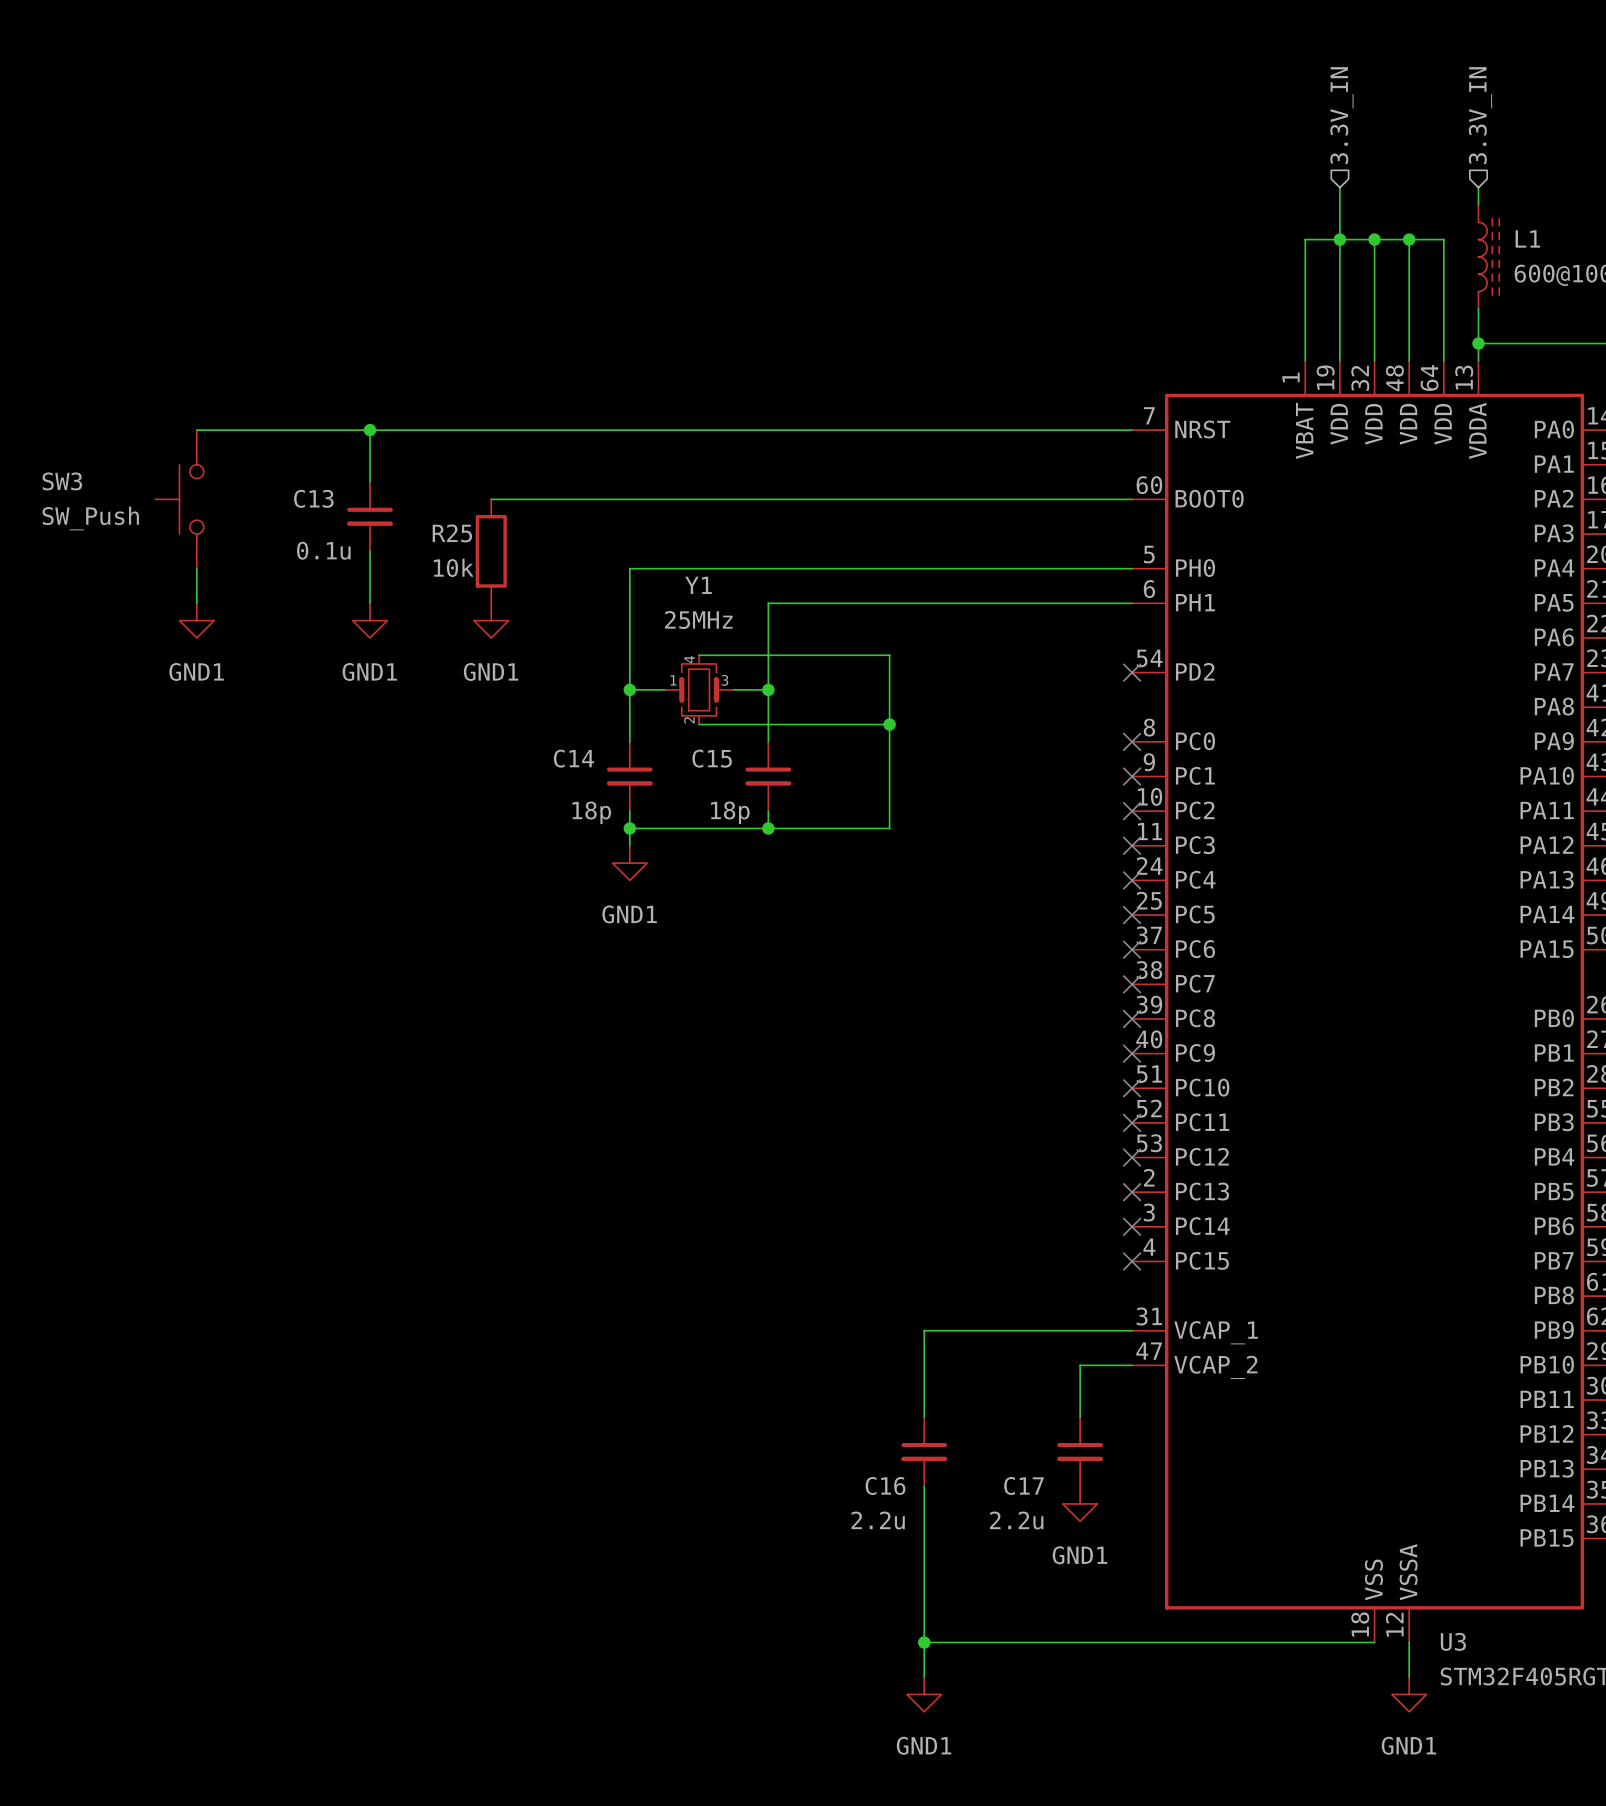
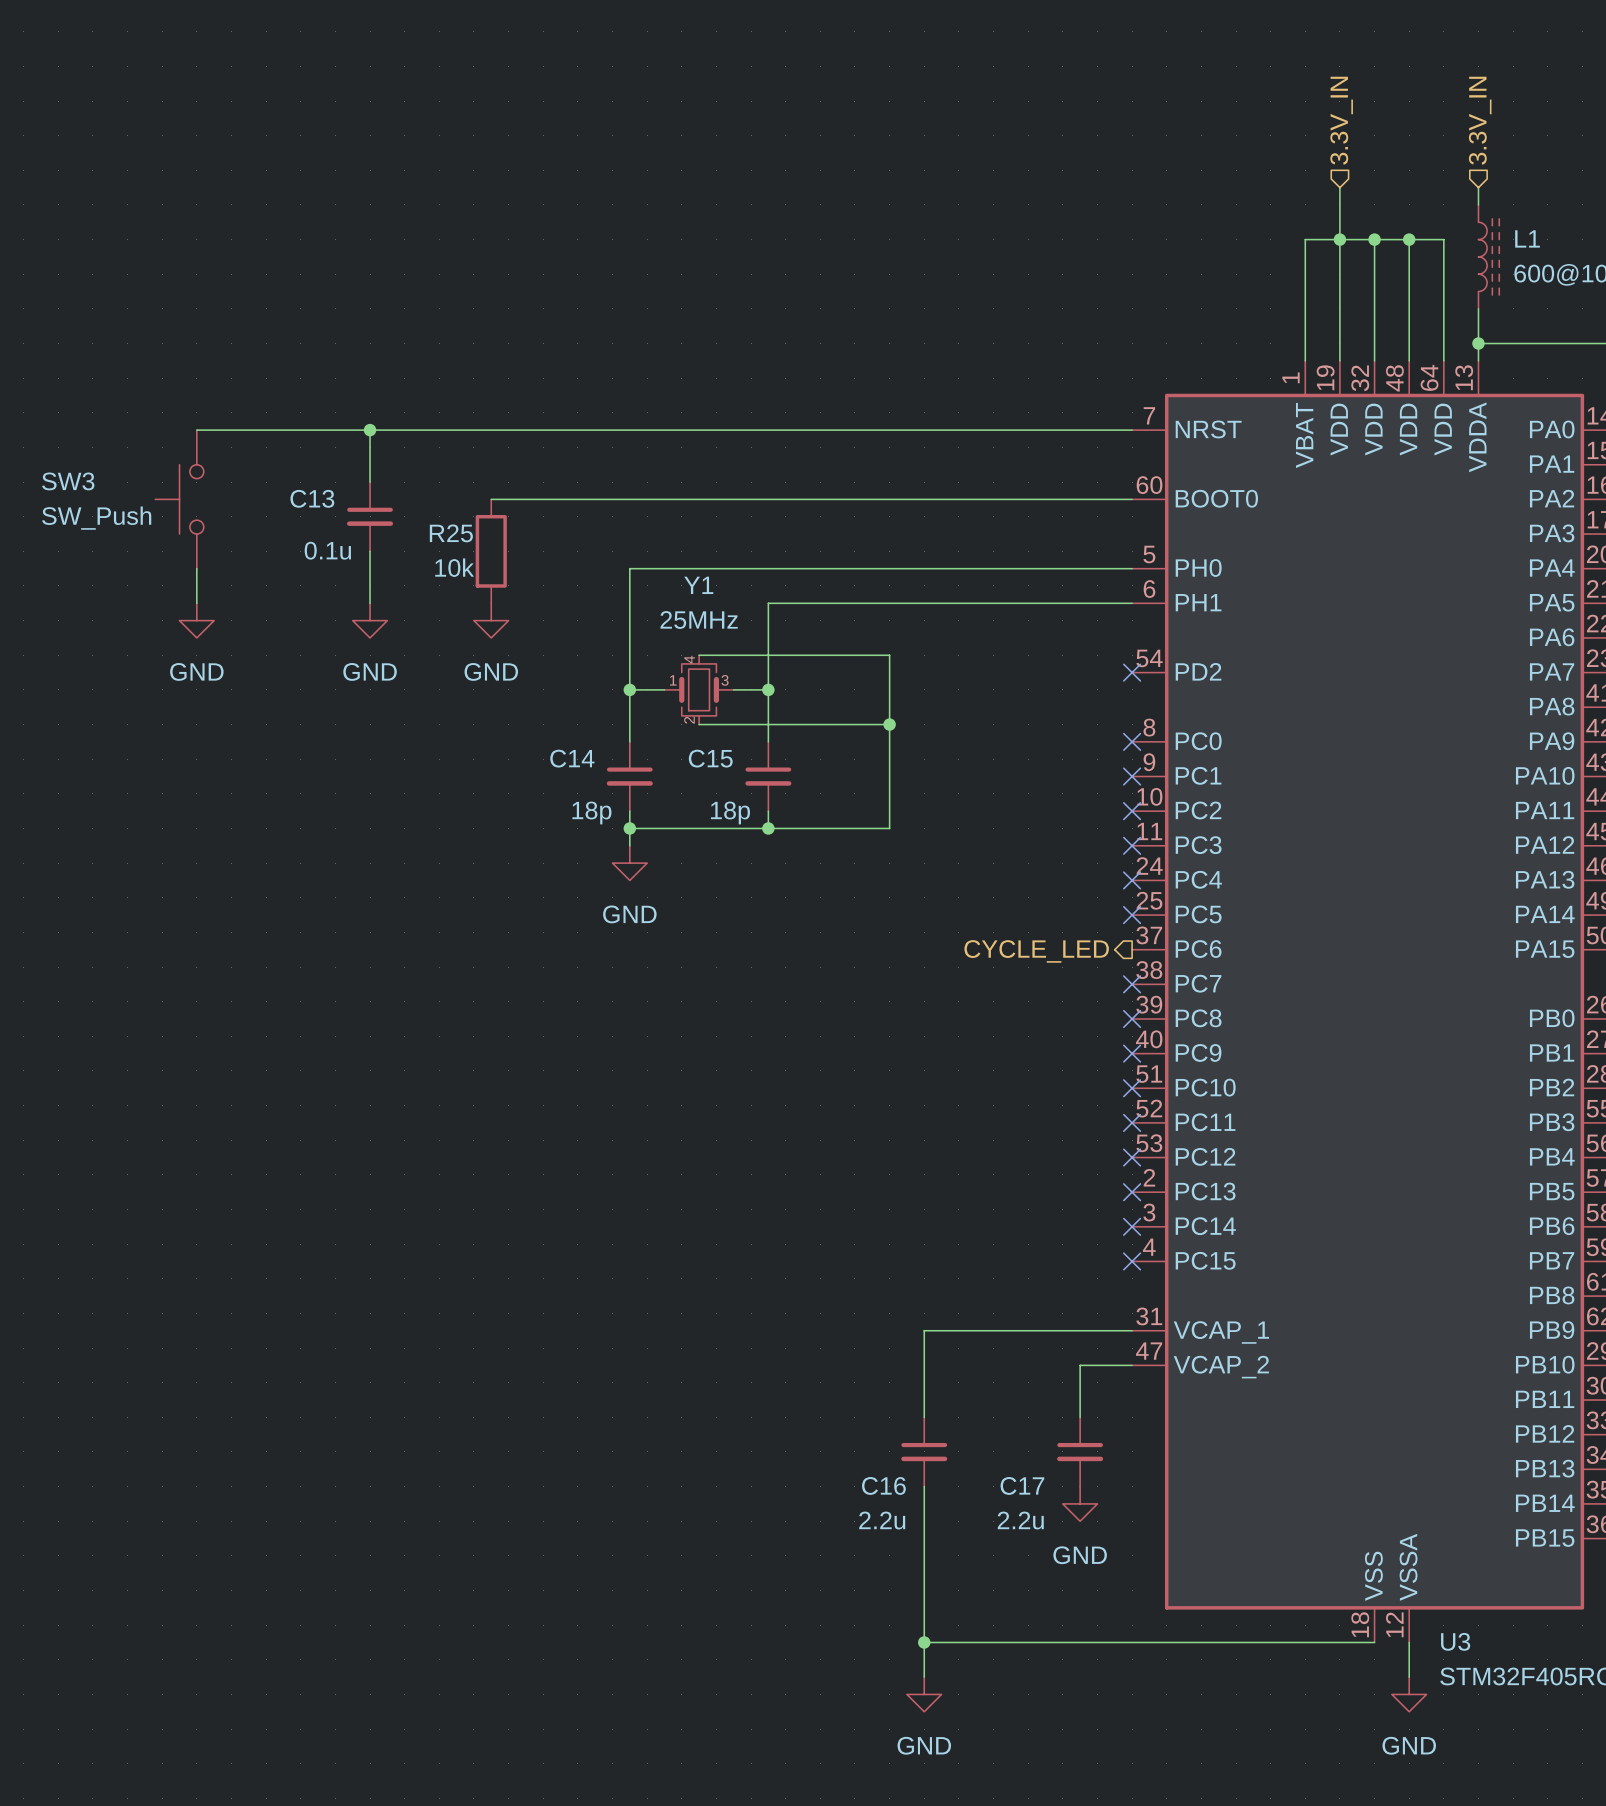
power symbol: GND1 (196, 620) -> GND (196, 620)
power symbol: GND1 (370, 620) -> GND (370, 620)
power symbol: GND1 (491, 620) -> GND (491, 620)
power symbol: GND1 (629, 863) -> GND (629, 863)
no-connect mark: (1132, 949) -> none
hierarchical label: none -> CYCLE_LED (1036, 951)
power symbol: GND1 (1080, 1503) -> GND (1080, 1503)
power symbol: GND1 (924, 1694) -> GND (924, 1694)
power symbol: GND1 (1409, 1694) -> GND (1409, 1694)

